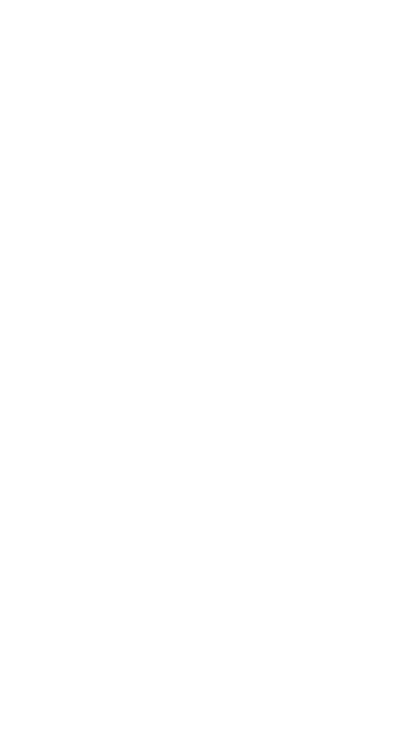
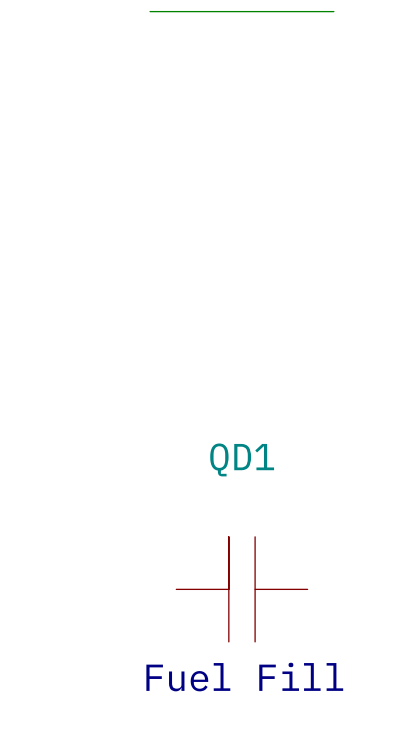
wire: none -> (150, 11) (333, 11)
QD1: none -> (241, 589)
text: none -> Fuel Fill (244, 677)

